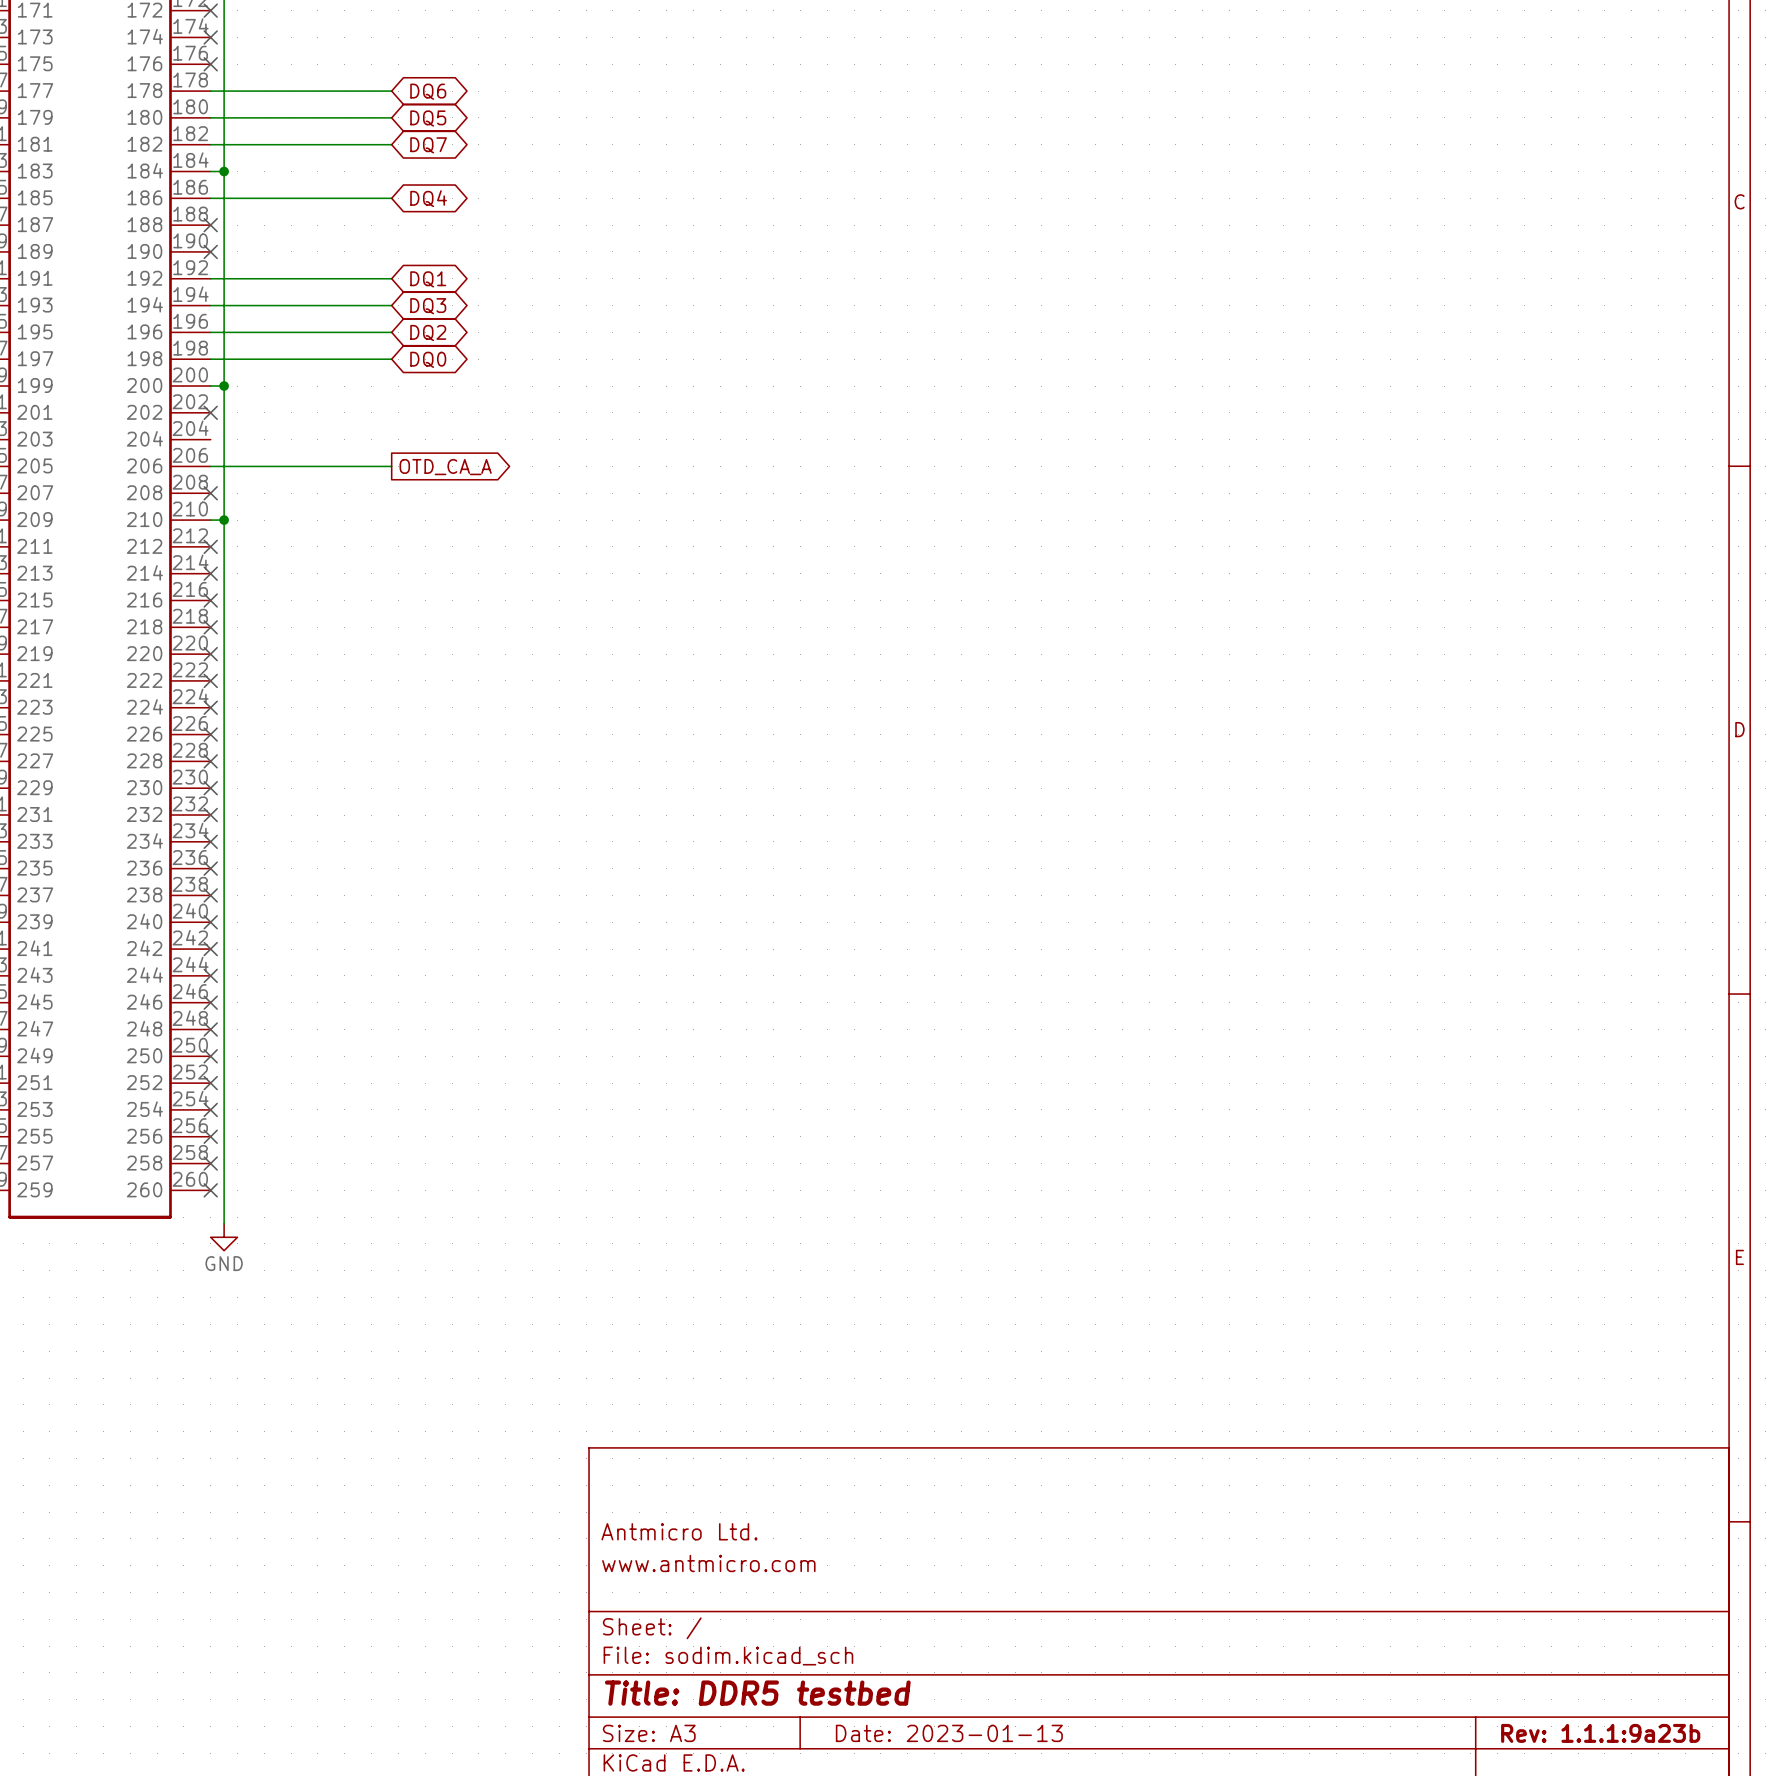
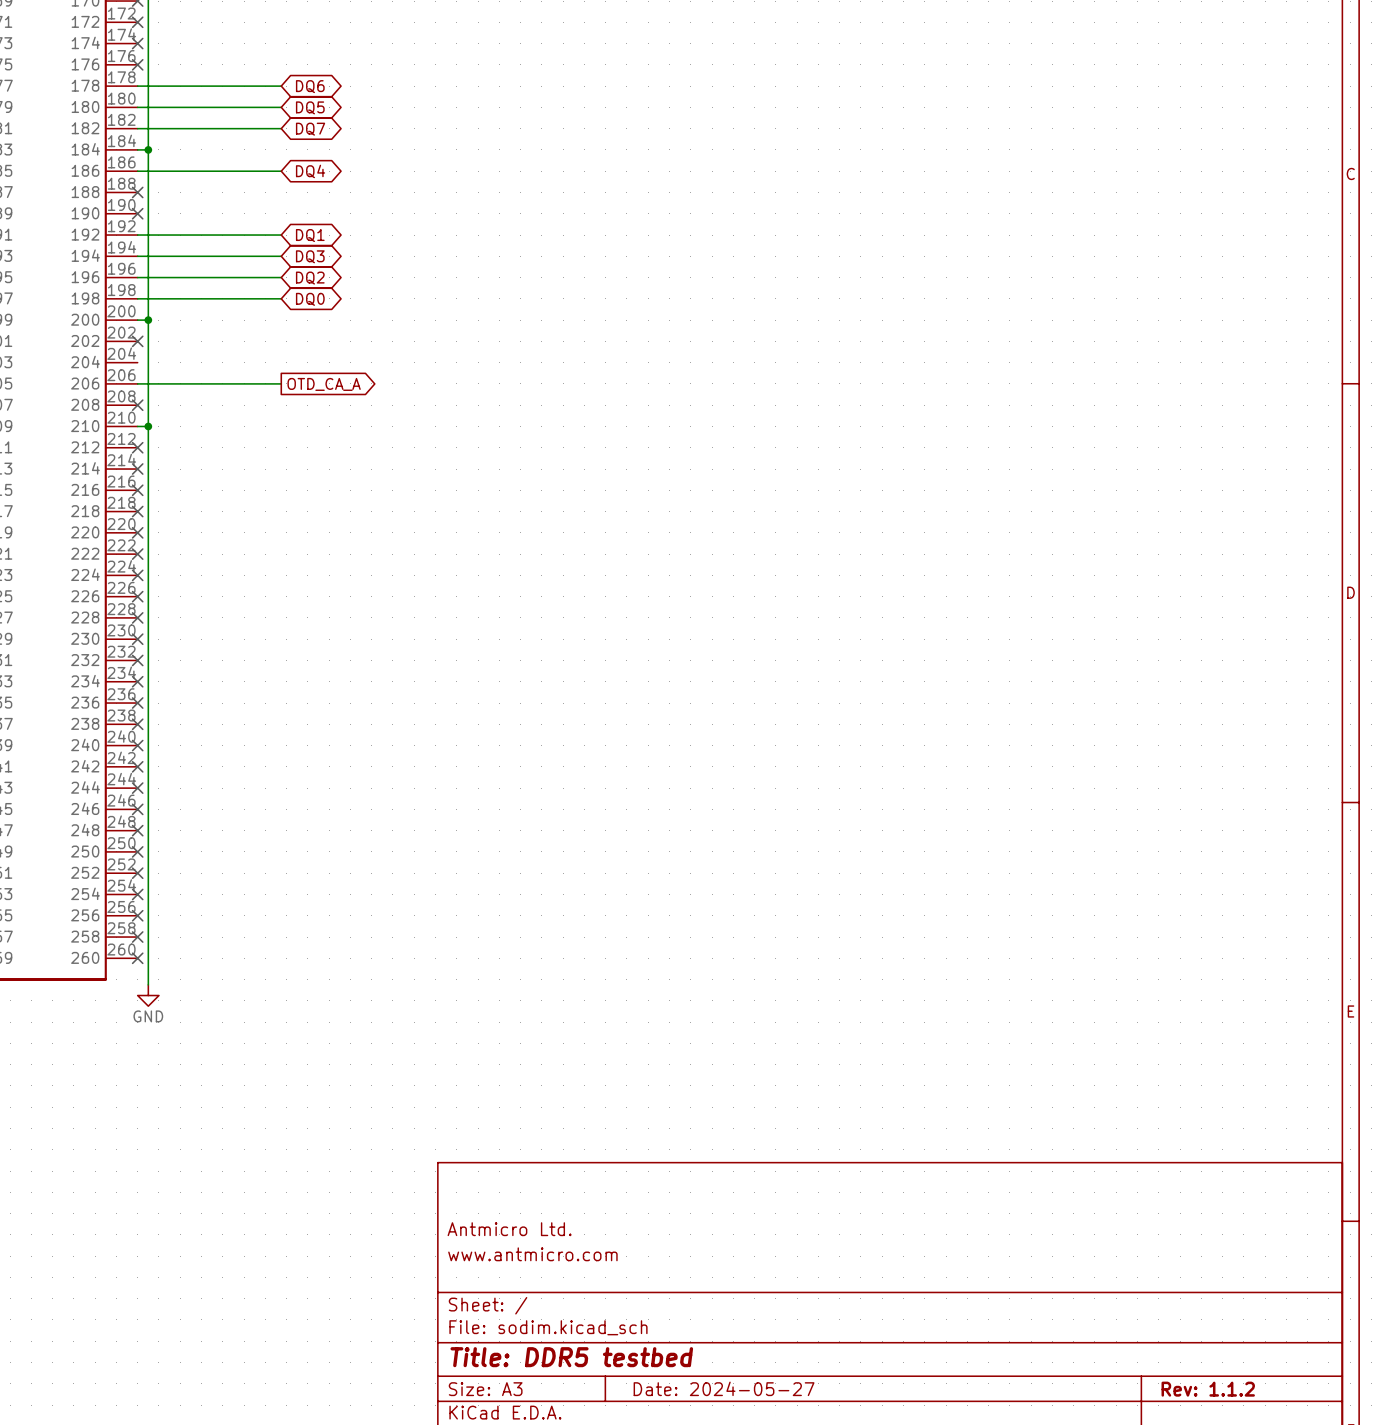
title block: Date: 2023-01-13 (949, 1733) -> Date: 2024-05-27 (724, 1388)
title block: Rev: 1.1.1:9a23b (1600, 1733) -> Rev: 1.1.2 (1208, 1389)

